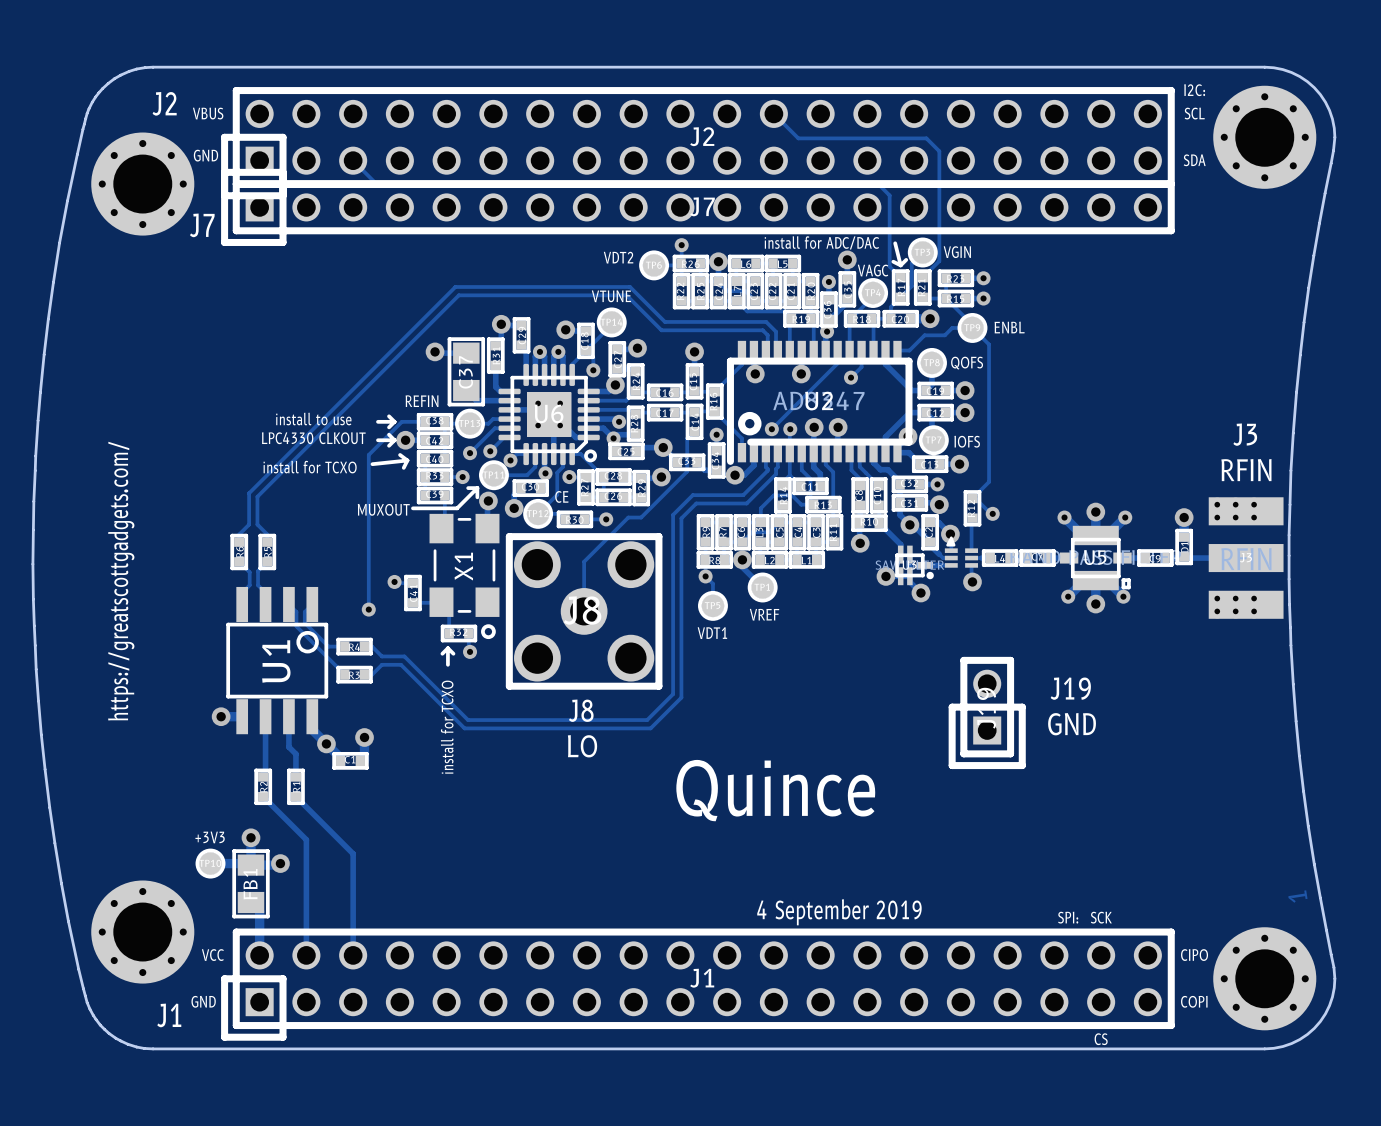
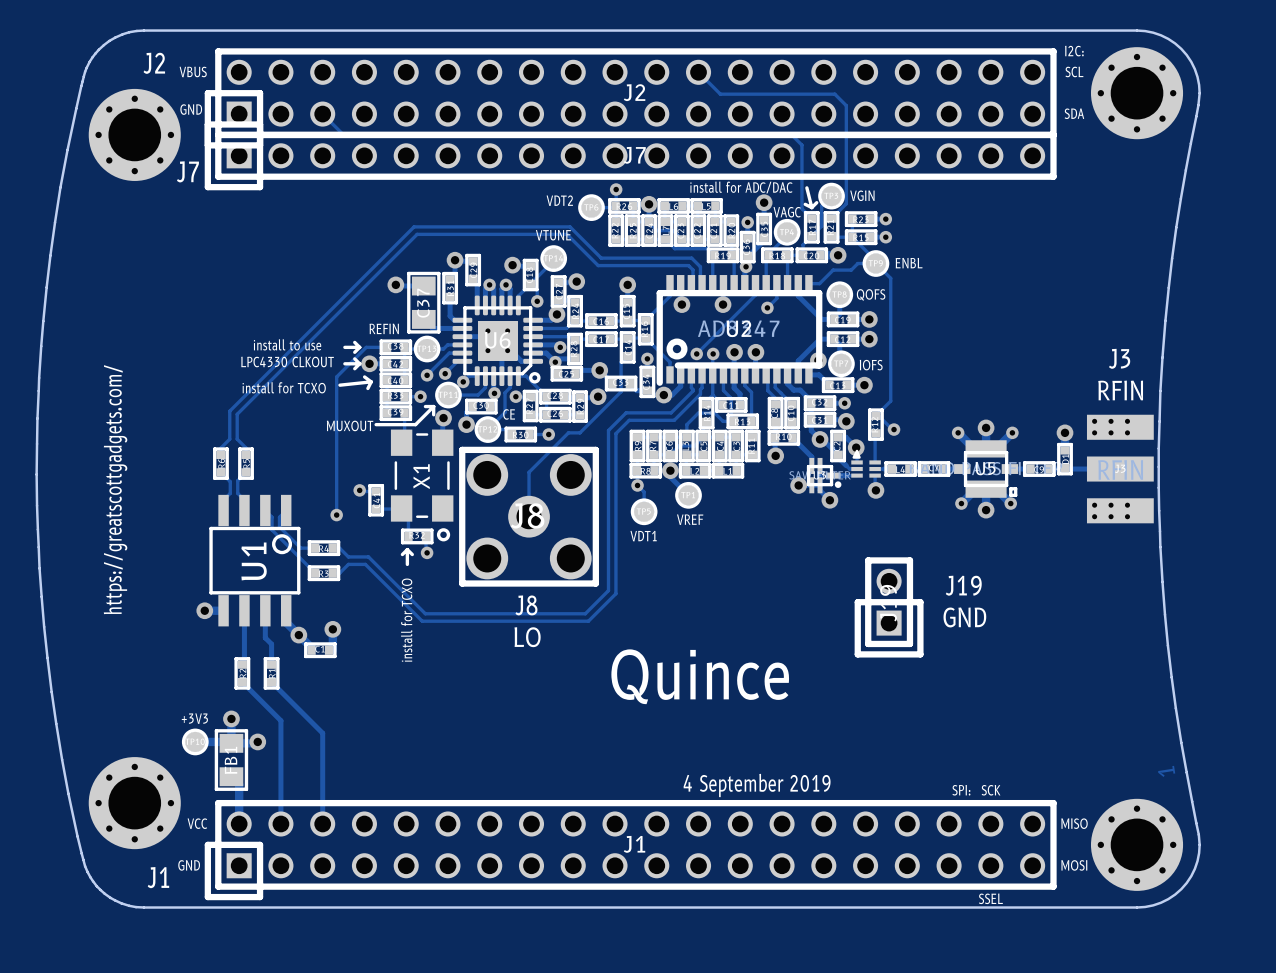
text: CIPO (1194, 955) -> MISO (1074, 823)
text: COPI (1194, 1001) -> MOSI (1074, 865)
text: CS (1101, 1039) -> SSEL (990, 898)

